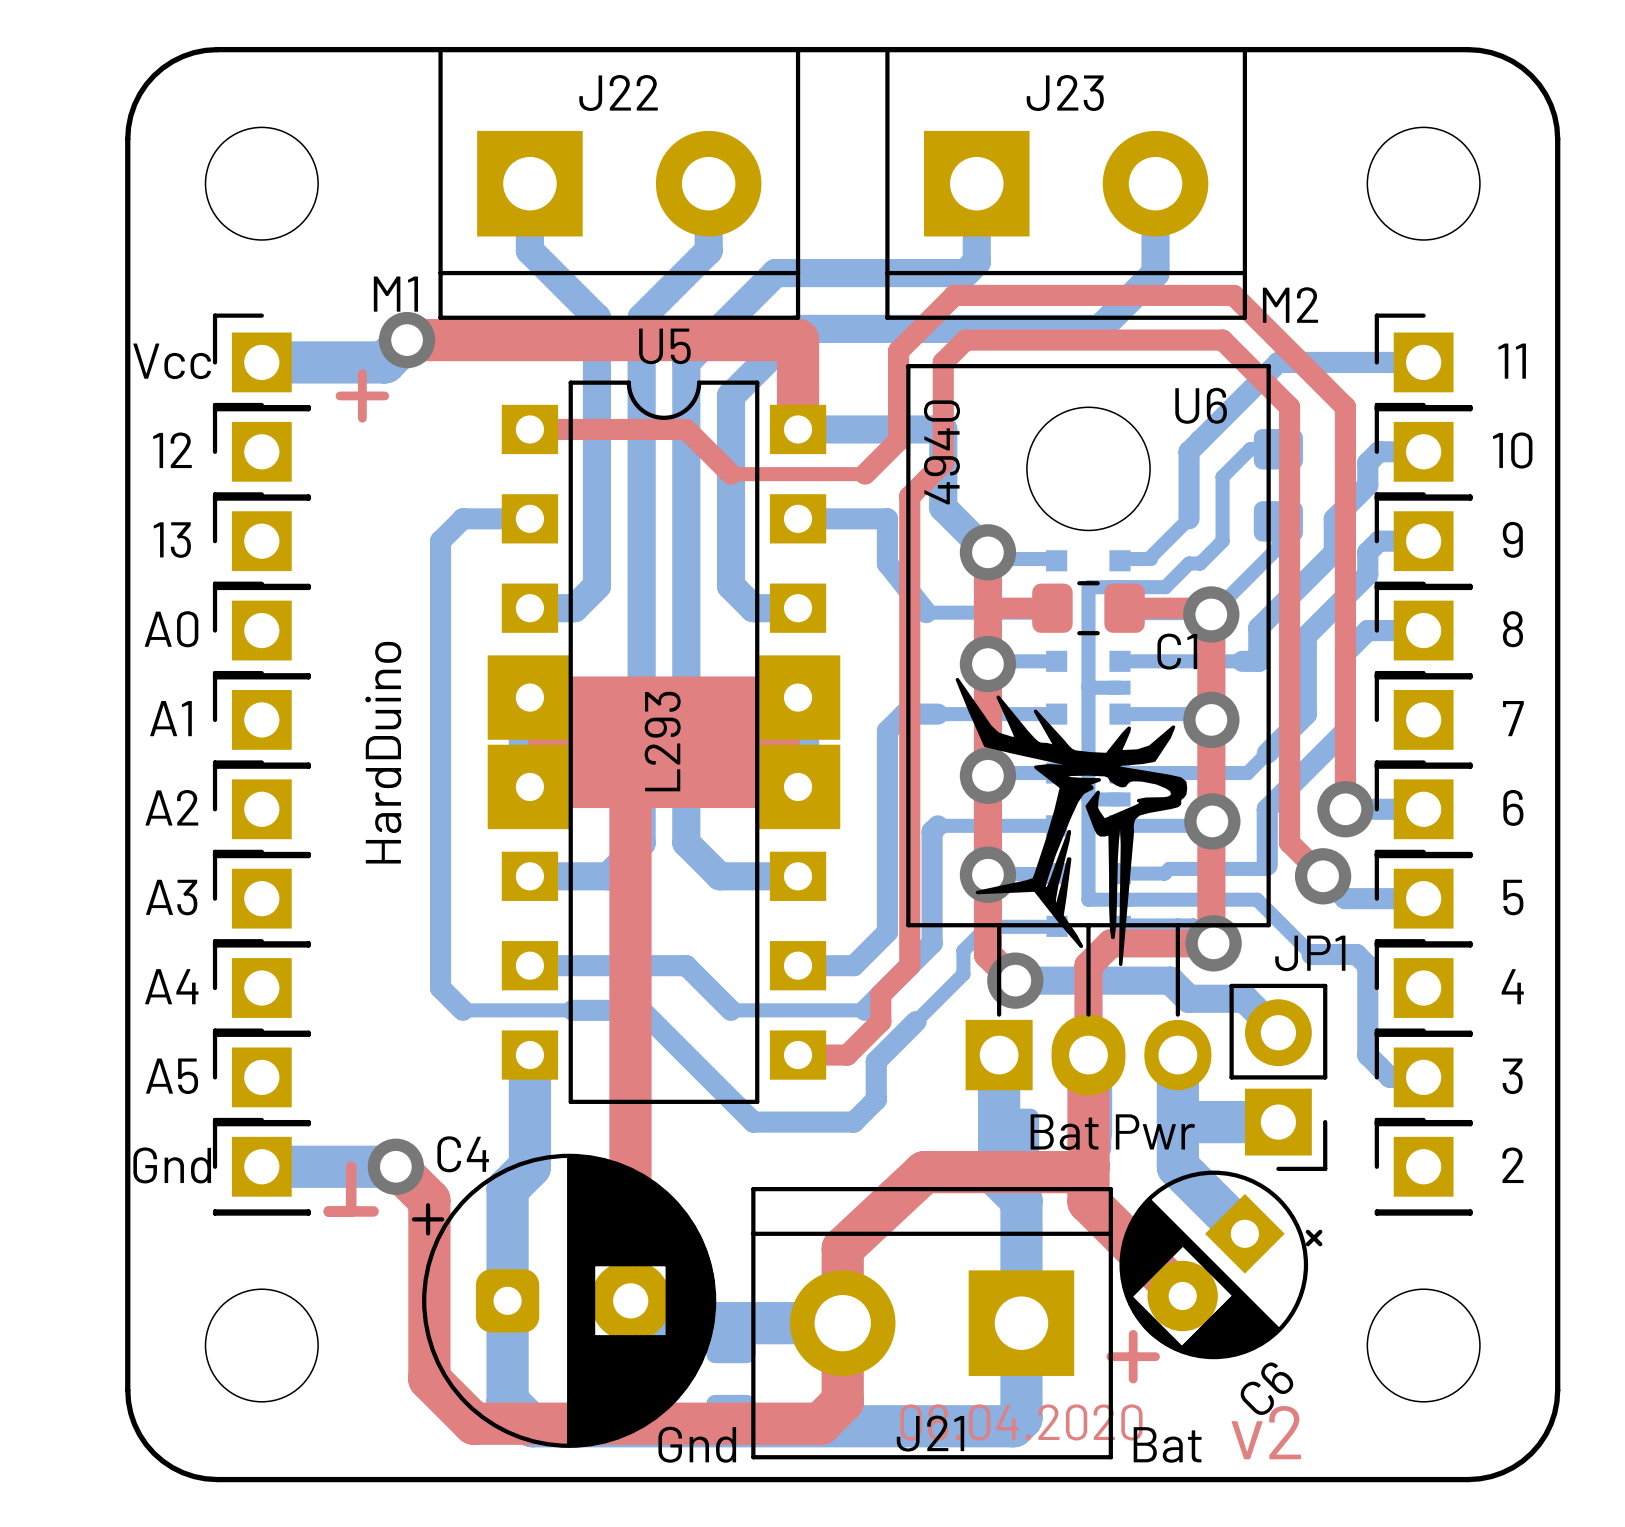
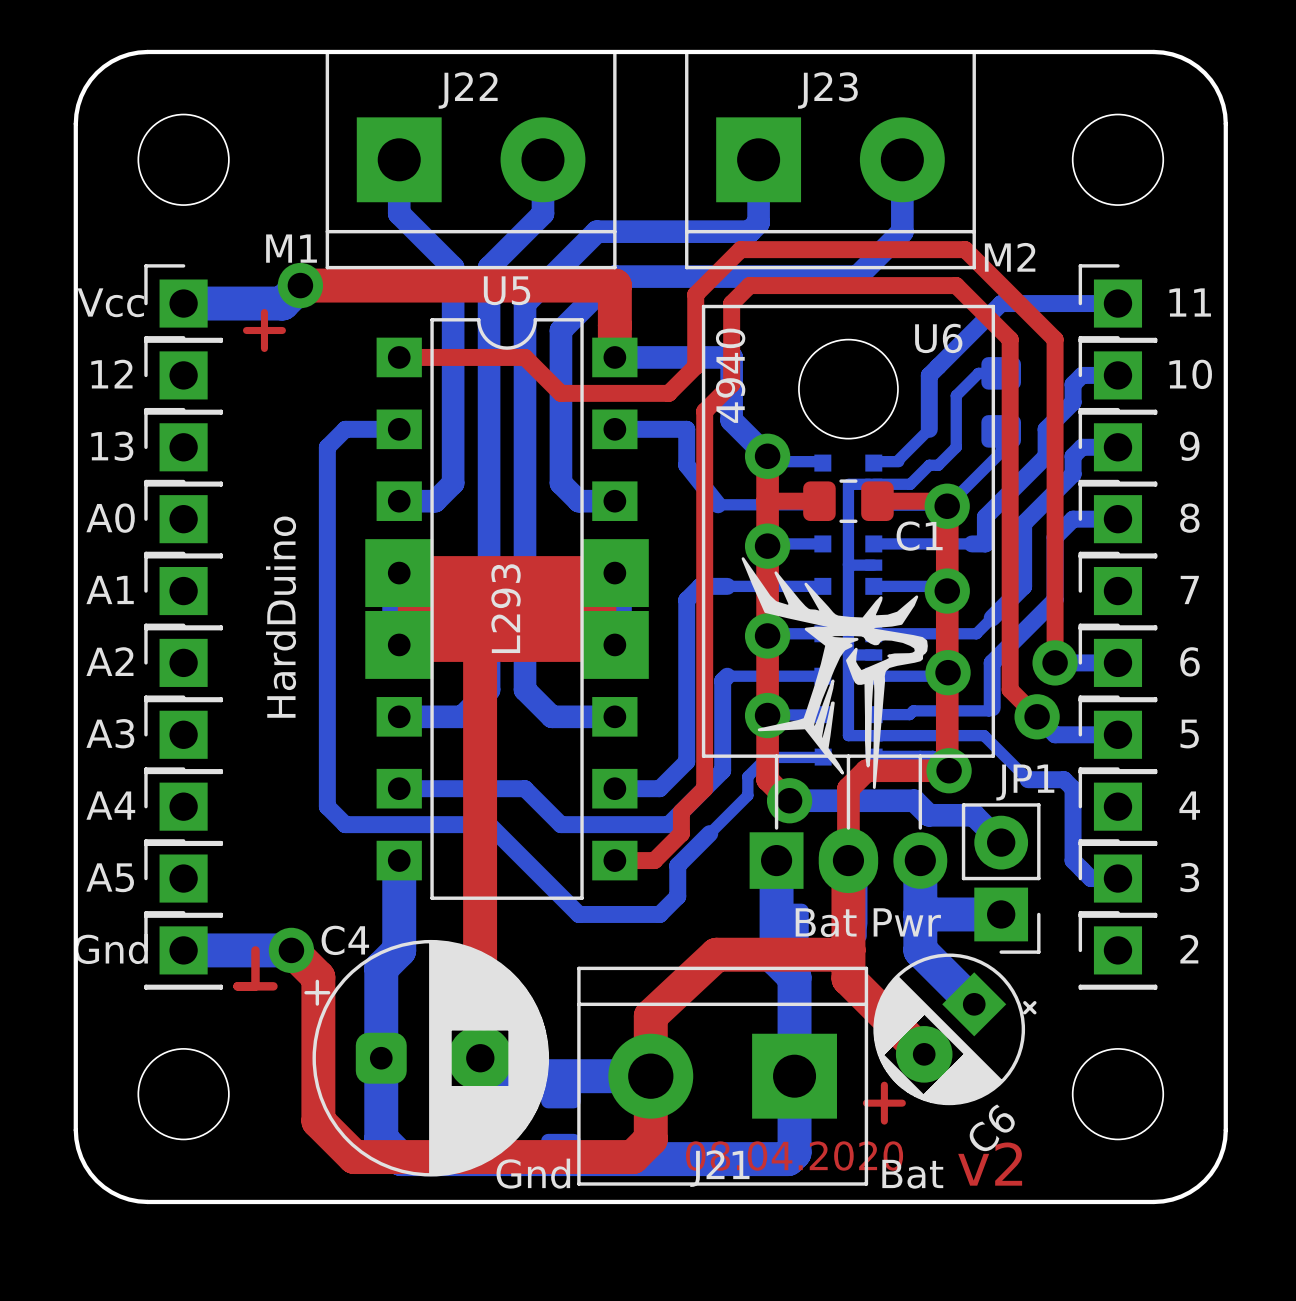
top track width: thin (731, 474) (865, 474) -> thick (560, 393) (668, 393)
bottom track width: thin (462, 1010) (572, 1010) -> thick (345, 824) (433, 824)
bottom track width: thin (731, 1010) (865, 1010) -> thick (560, 824) (668, 824)

